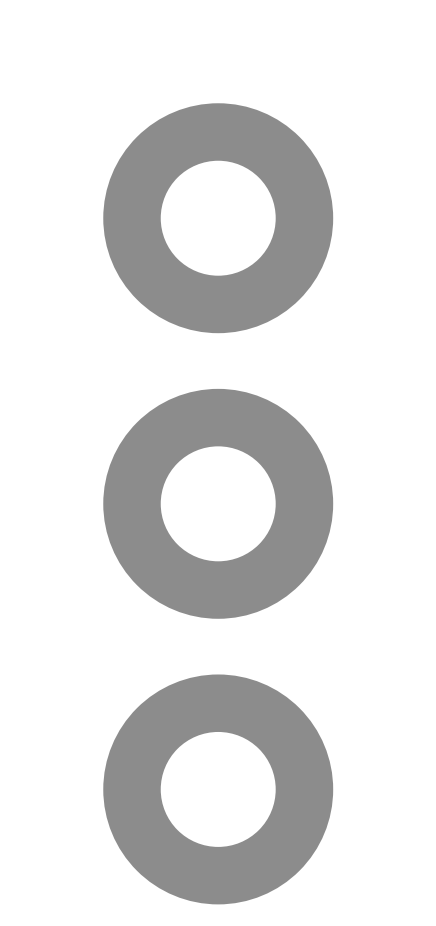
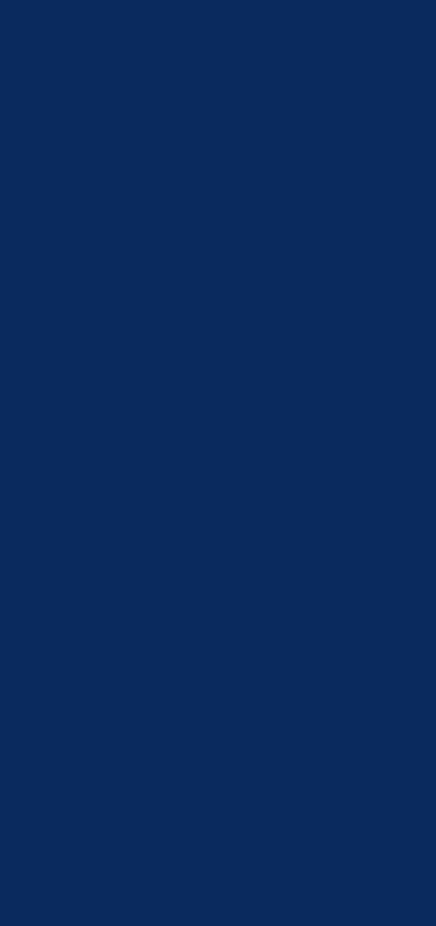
part: (218, 218) -> none
part: (218, 503) -> none
part: (218, 789) -> none

